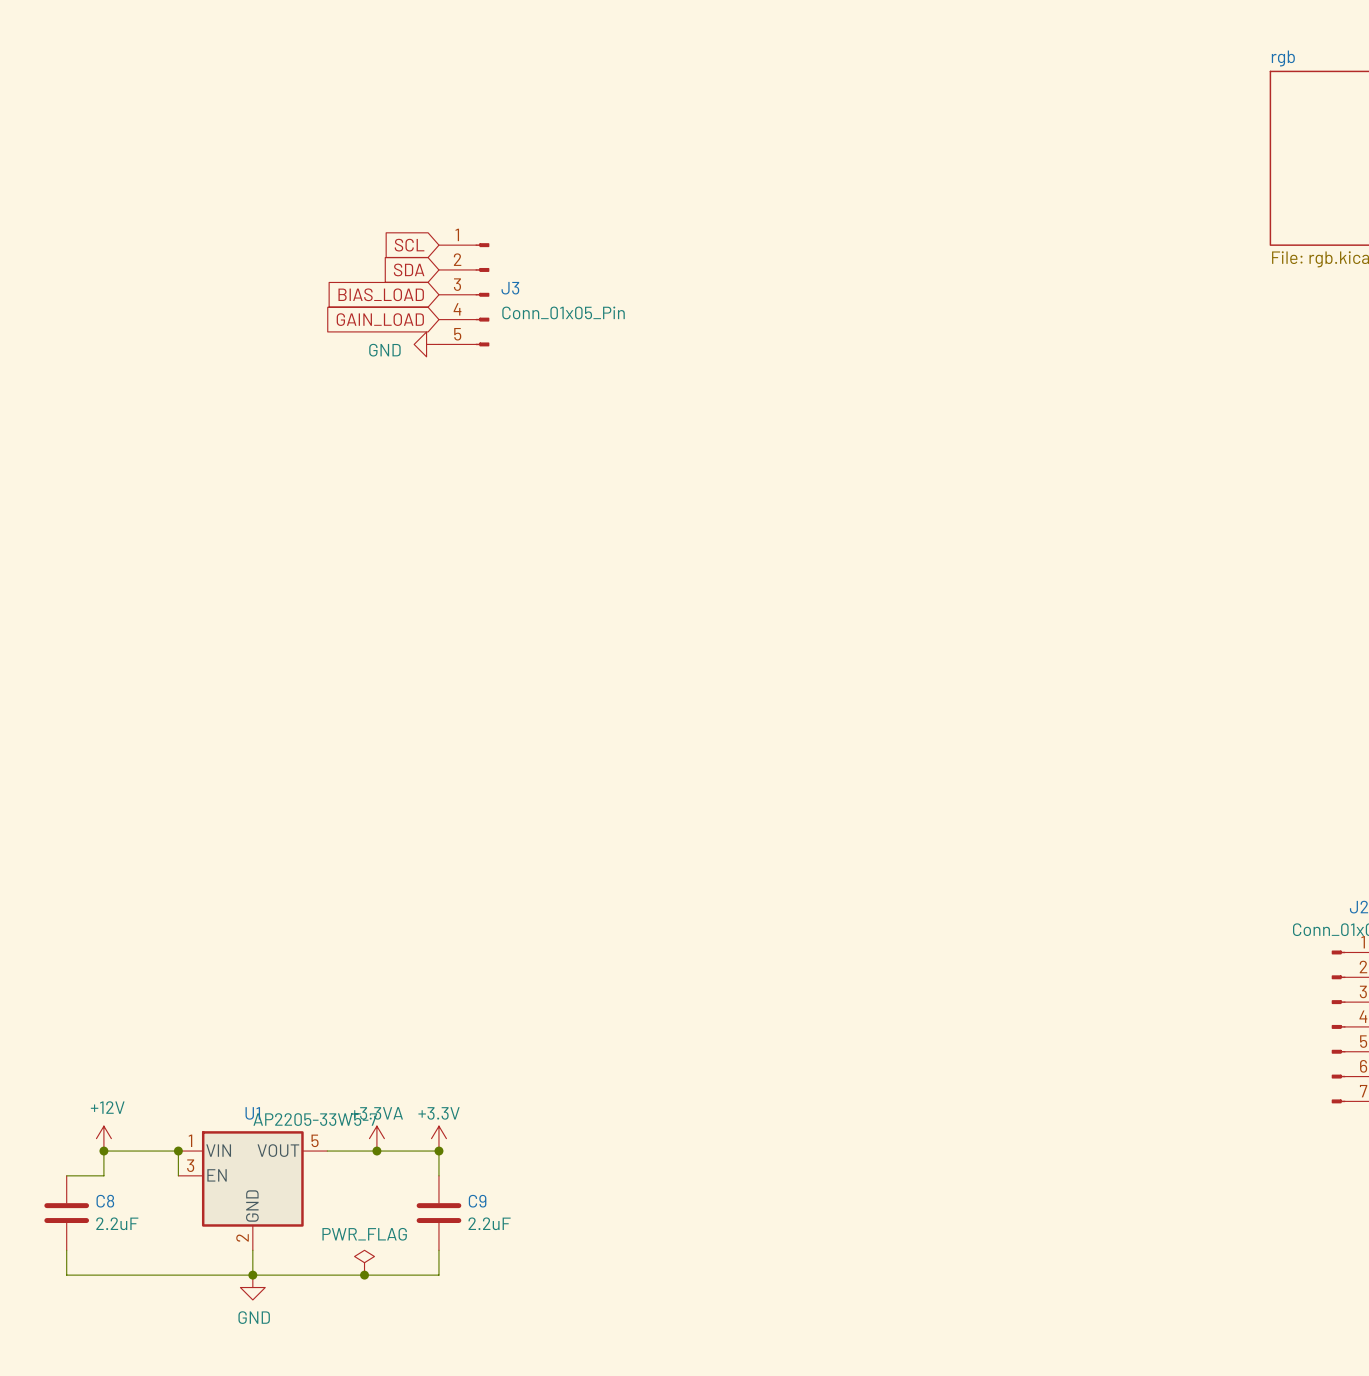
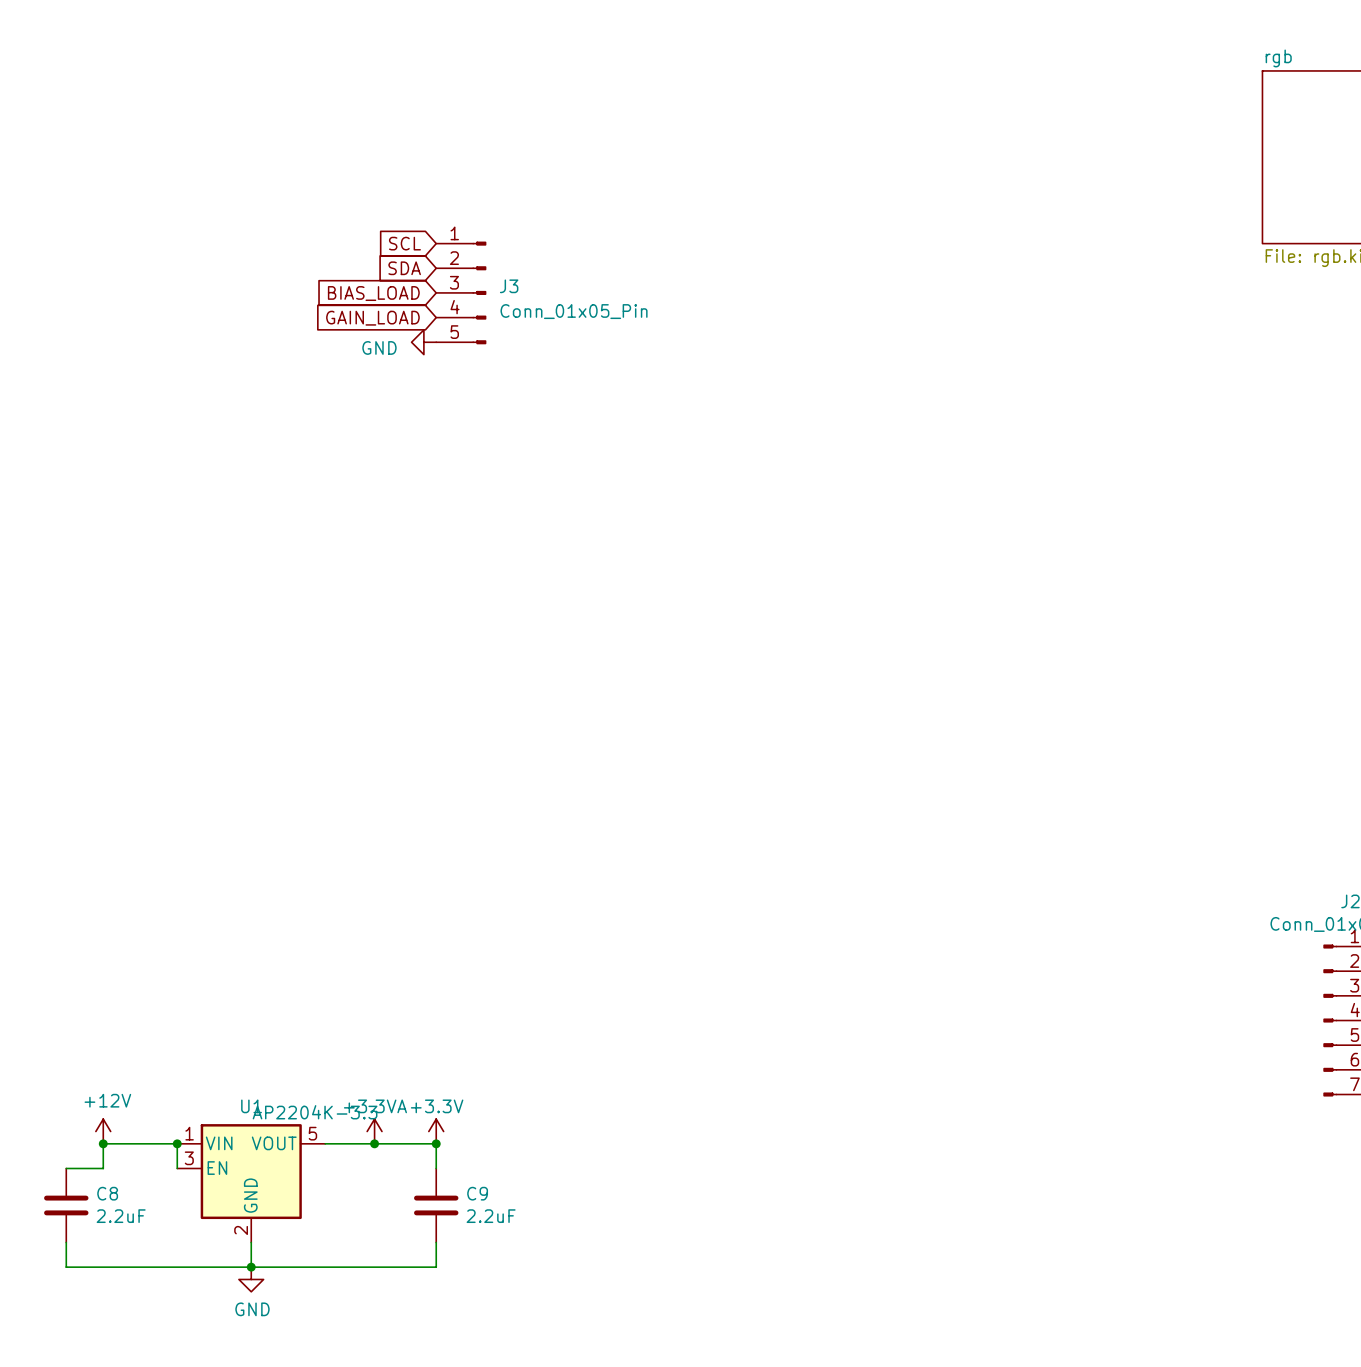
U1 value: AP2205-33W5-7 (315, 1119) -> AP2204K-3.3 (315, 1112)
power symbol: PWR_FLAG (364, 1262) -> none
junction: (364, 1275) -> none

